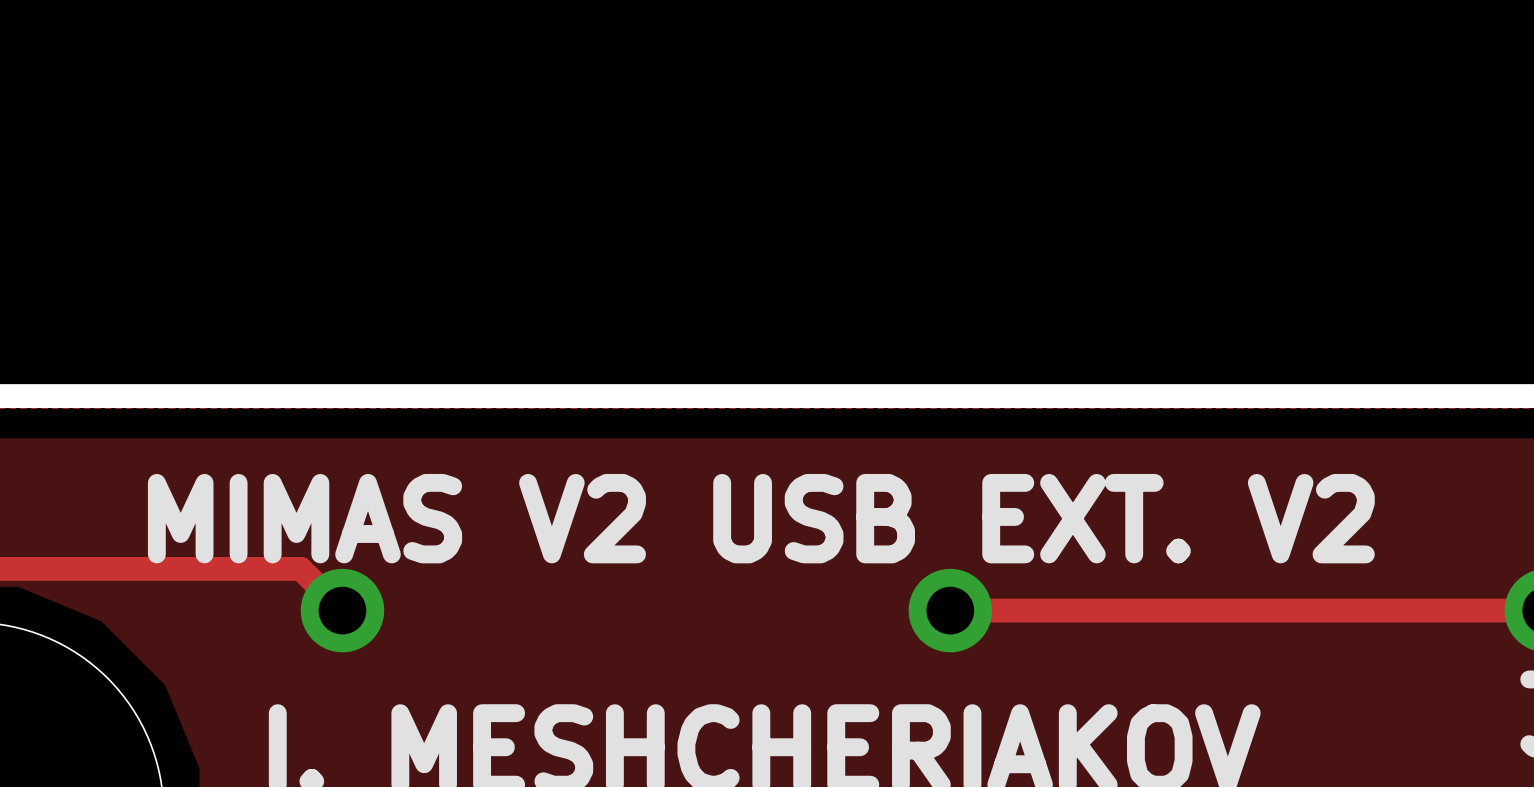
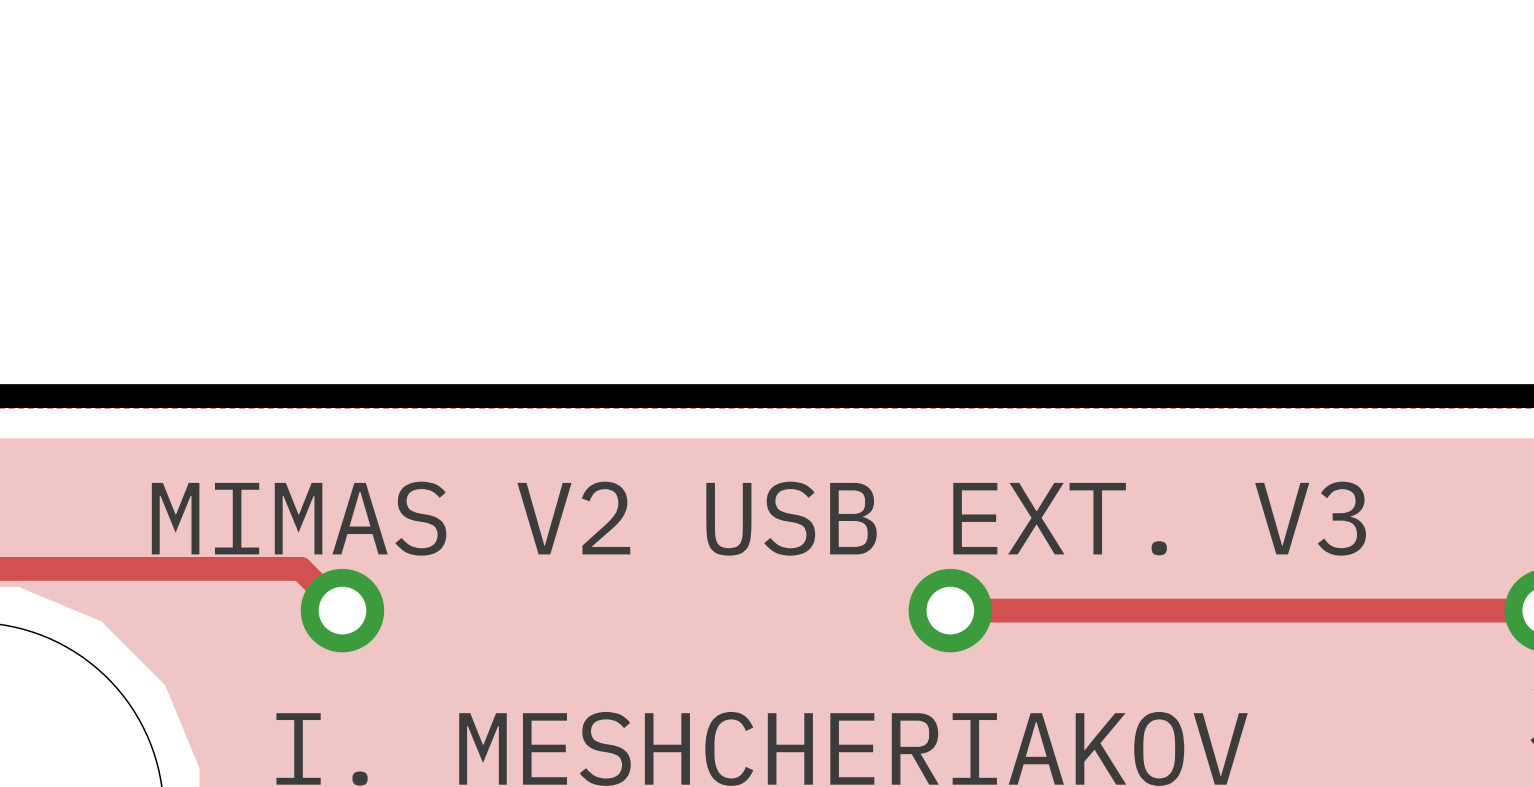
text: MIMAS V2 USB EXT. V2 (761, 518) -> MIMAS V2 USB EXT. V3 (758, 518)

